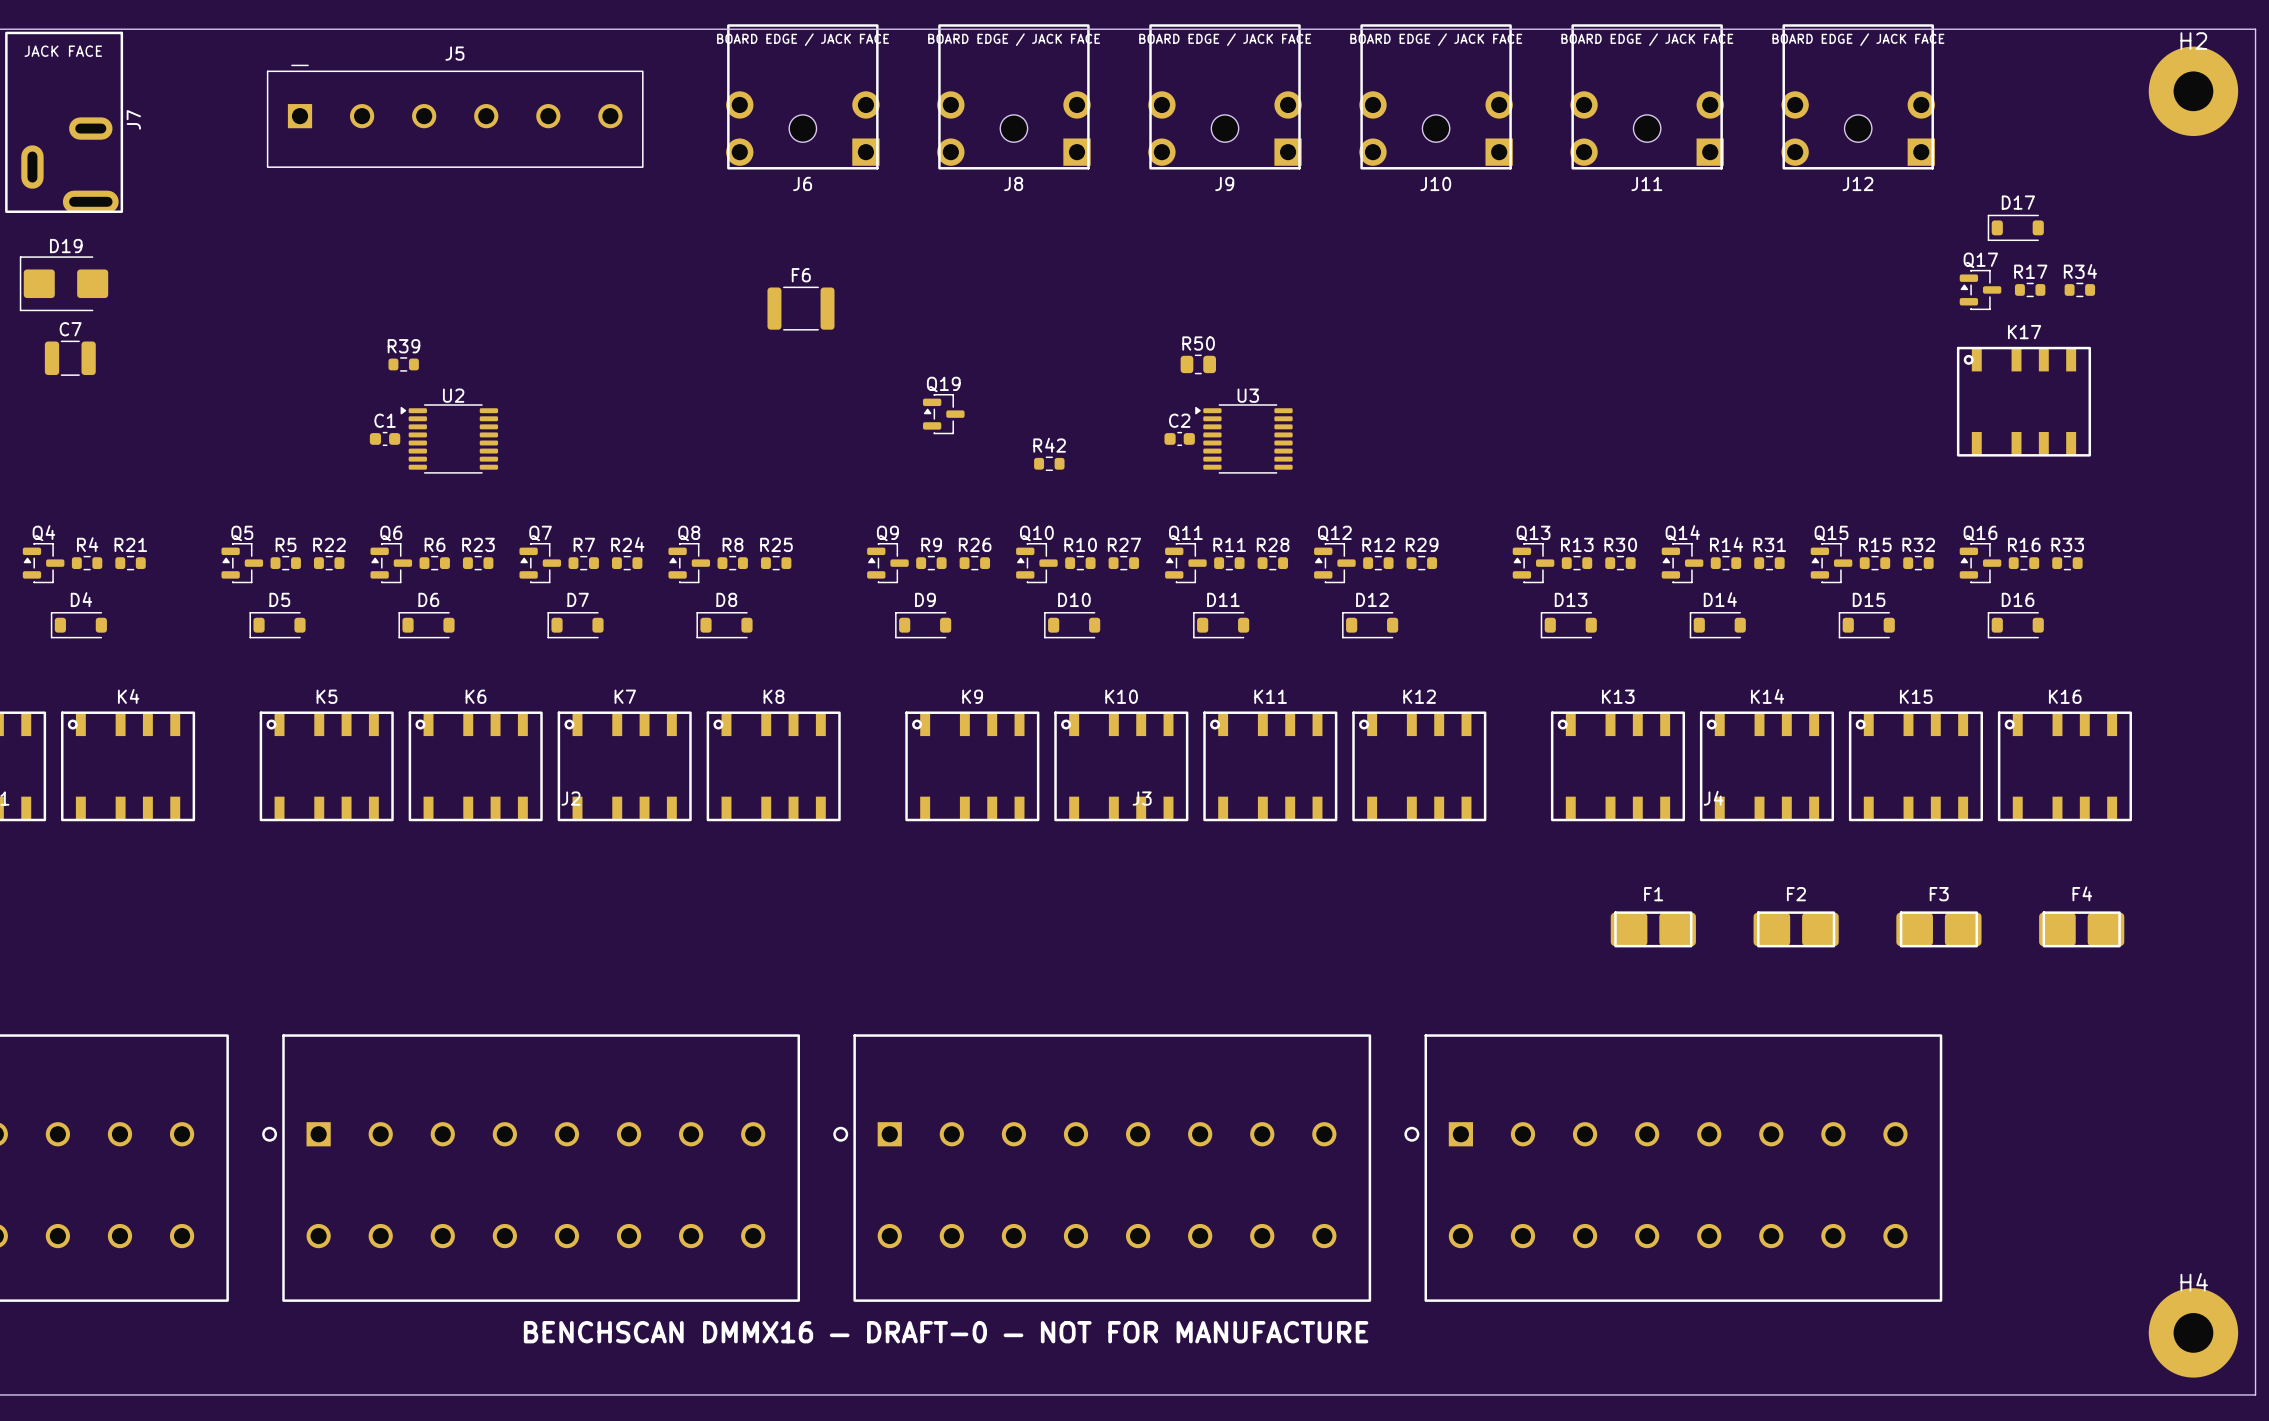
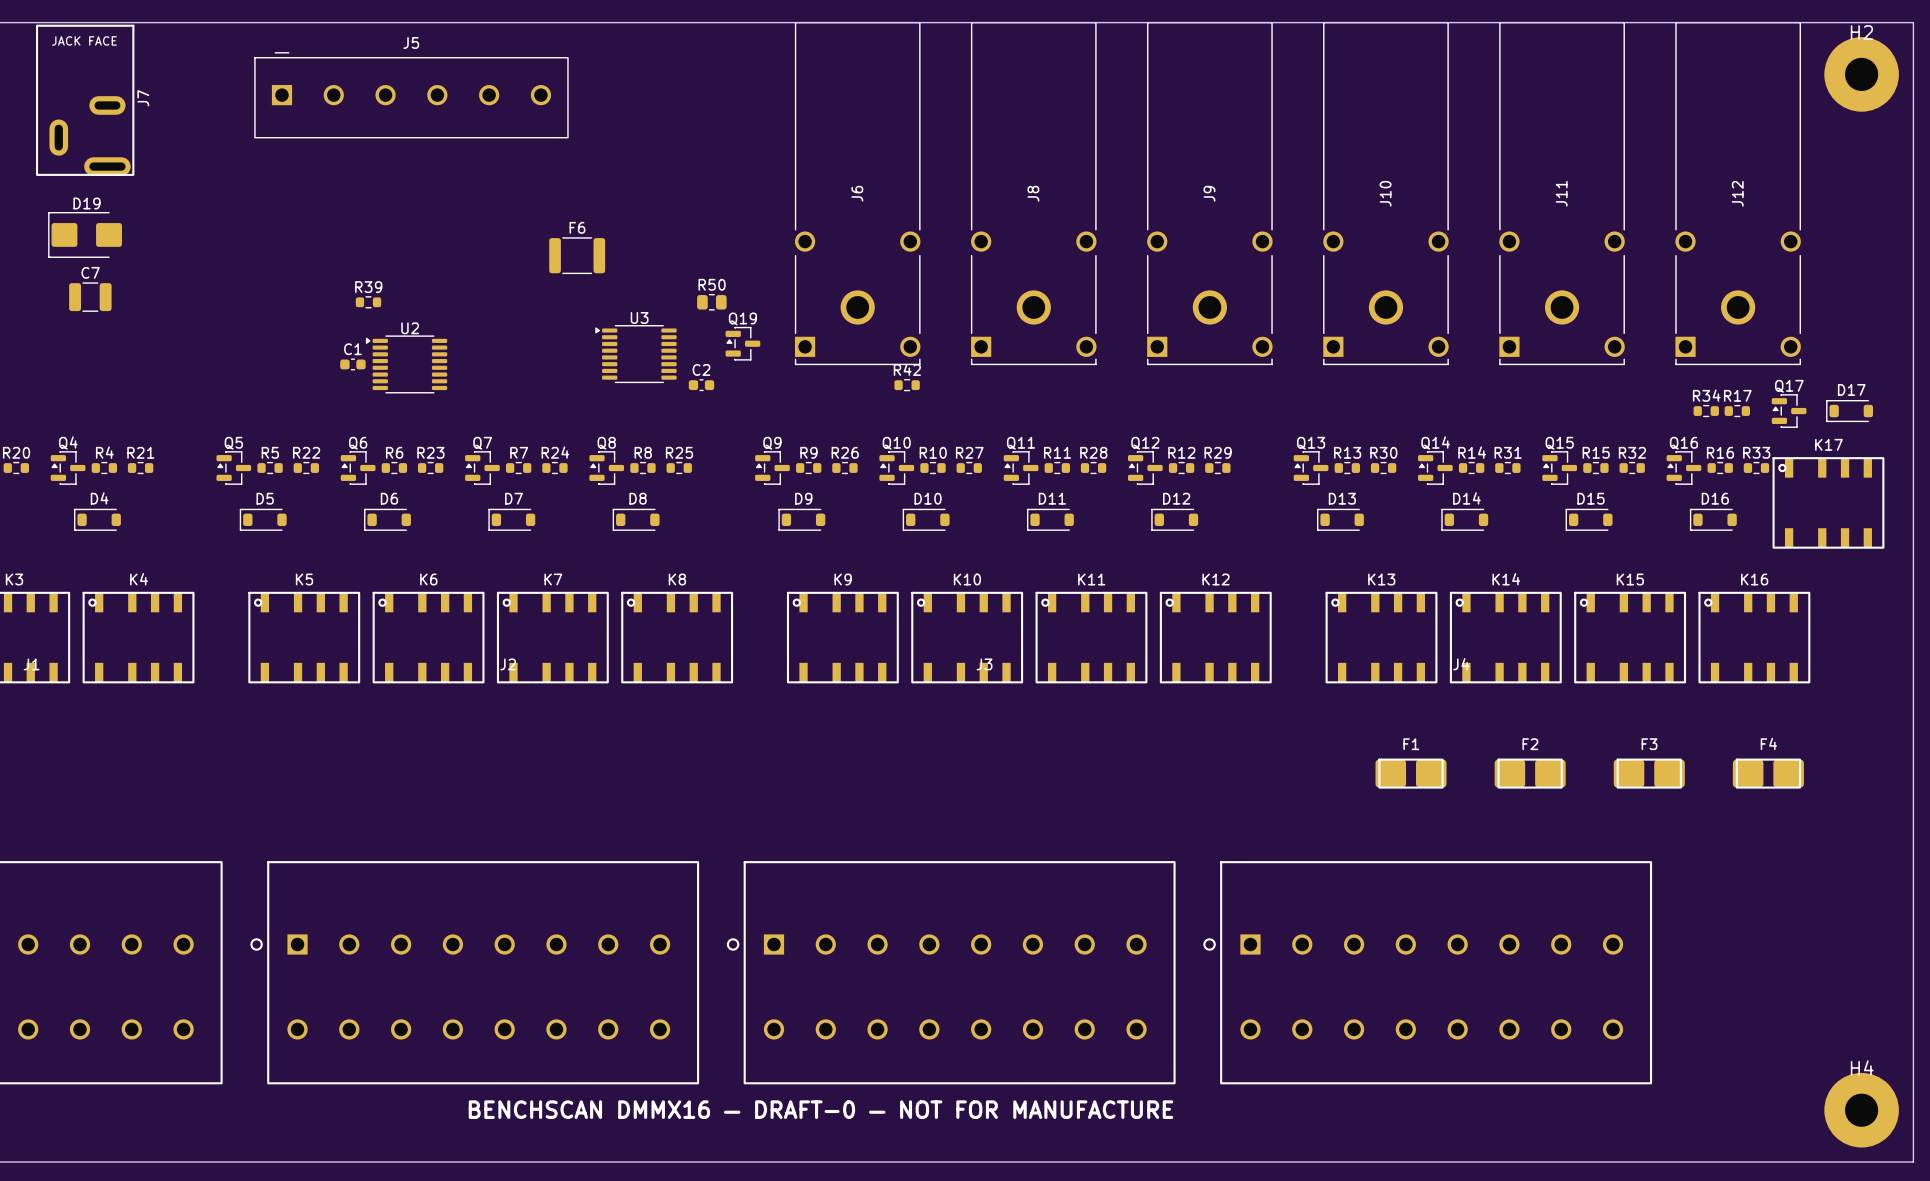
J6 footprint: [726, 24, 880, 170] -> [794, 22, 921, 365]
J8 footprint: [937, 24, 1091, 170] -> [971, 22, 1097, 365]
J9 footprint: [1148, 24, 1302, 170] -> [1147, 22, 1273, 365]
J10 footprint: [1359, 24, 1513, 170] -> [1323, 22, 1449, 365]
J11 footprint: [1570, 24, 1724, 170] -> [1499, 22, 1625, 365]
J12 footprint: [1781, 24, 1935, 170] -> [1675, 22, 1801, 365]
J6 name position: J6 (802, 183) -> J6 (857, 193)
J8 name position: J8 (1013, 183) -> J8 (1033, 193)
J9 name position: J9 (1224, 183) -> J9 (1209, 193)
J10 name position: J10 (1435, 183) -> J10 (1385, 193)
J11 name position: J11 (1646, 183) -> J11 (1561, 193)
J12 name position: J12 (1857, 183) -> J12 (1737, 193)
D17 position: (2015, 227) -> (1849, 411)
Q17 position: (1980, 289) -> (1789, 411)
R17 position: (2030, 289) -> (1737, 411)
R34 position: (2079, 289) -> (1706, 411)
F6 position: (800, 308) -> (577, 255)
R50 position: (1198, 364) -> (711, 302)
K17 position: (2023, 401) -> (1828, 502)
Q19 position: (943, 414) -> (742, 343)
C2 position: (1179, 438) -> (701, 385)
U3 position: (1243, 438) -> (635, 354)

